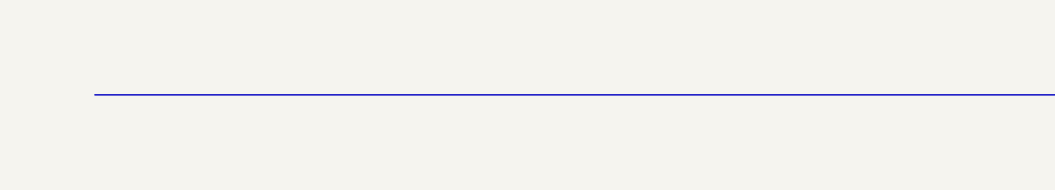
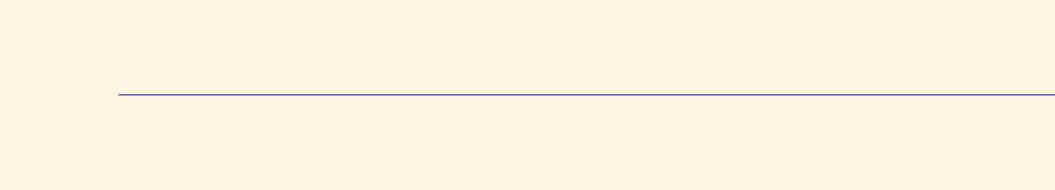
line: (94, 94) (118, 94) -> none

